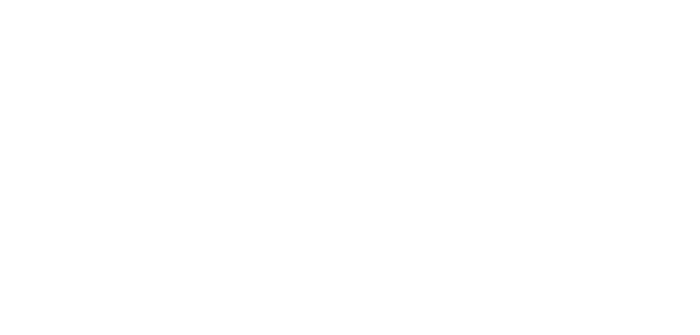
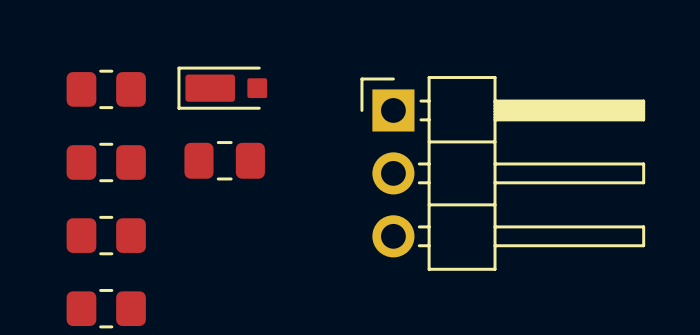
part: none -> (222, 88)
part: none -> (106, 89)
part: none -> (224, 160)
part: none -> (106, 162)
part: none -> (502, 173)
part: none -> (106, 235)
part: none -> (106, 308)

